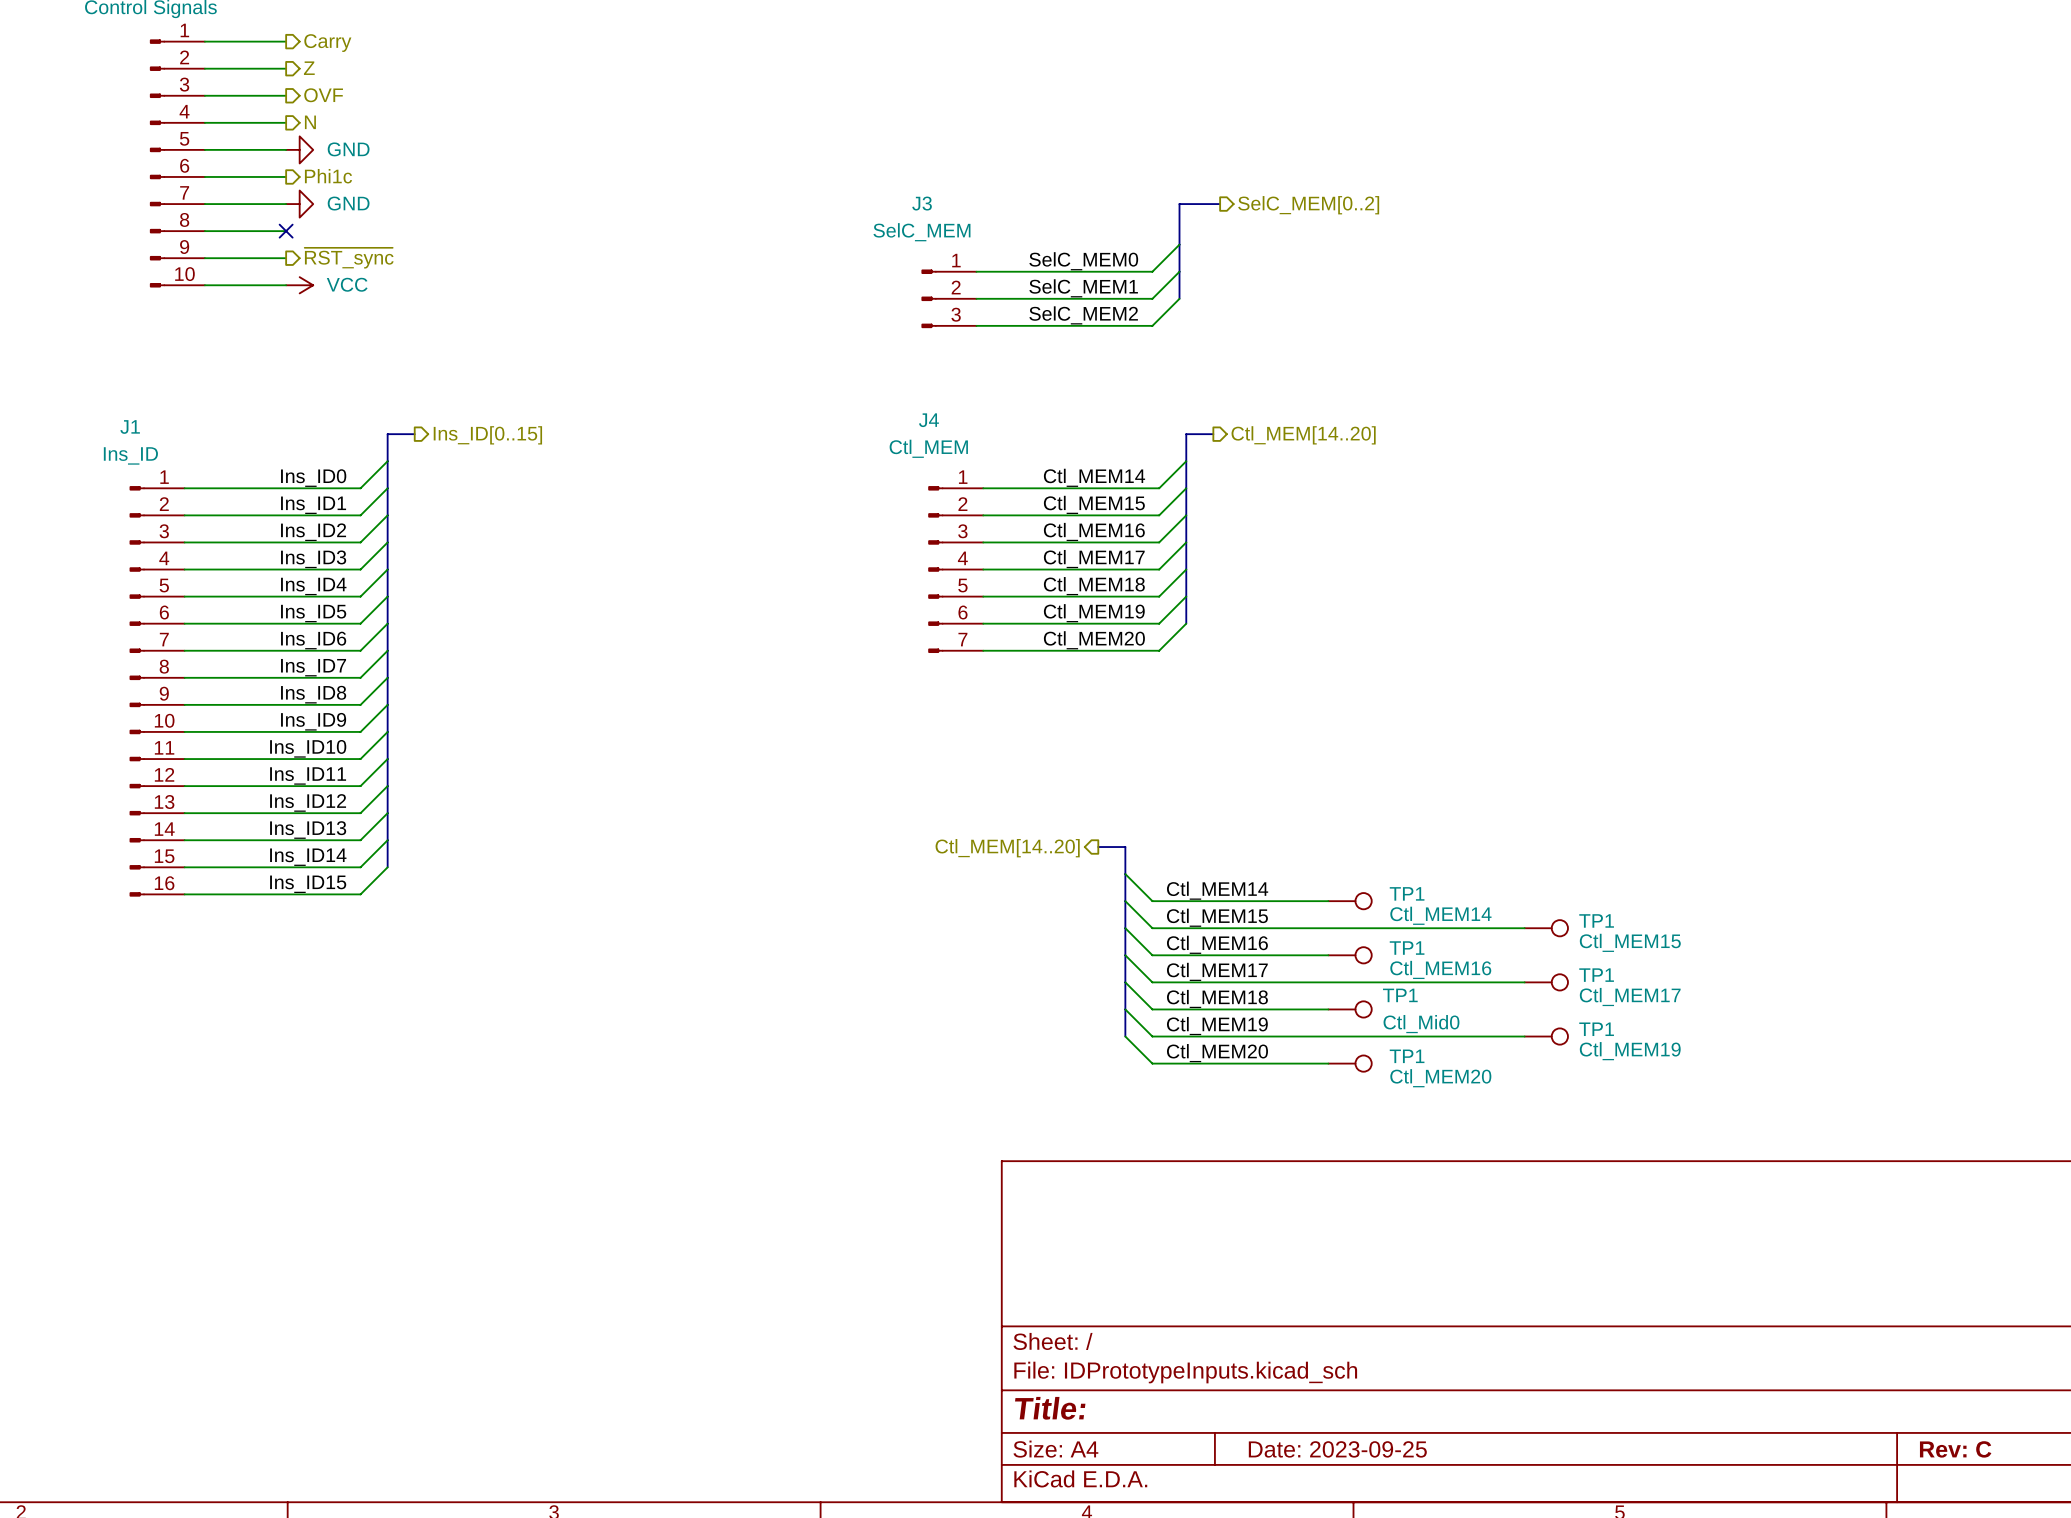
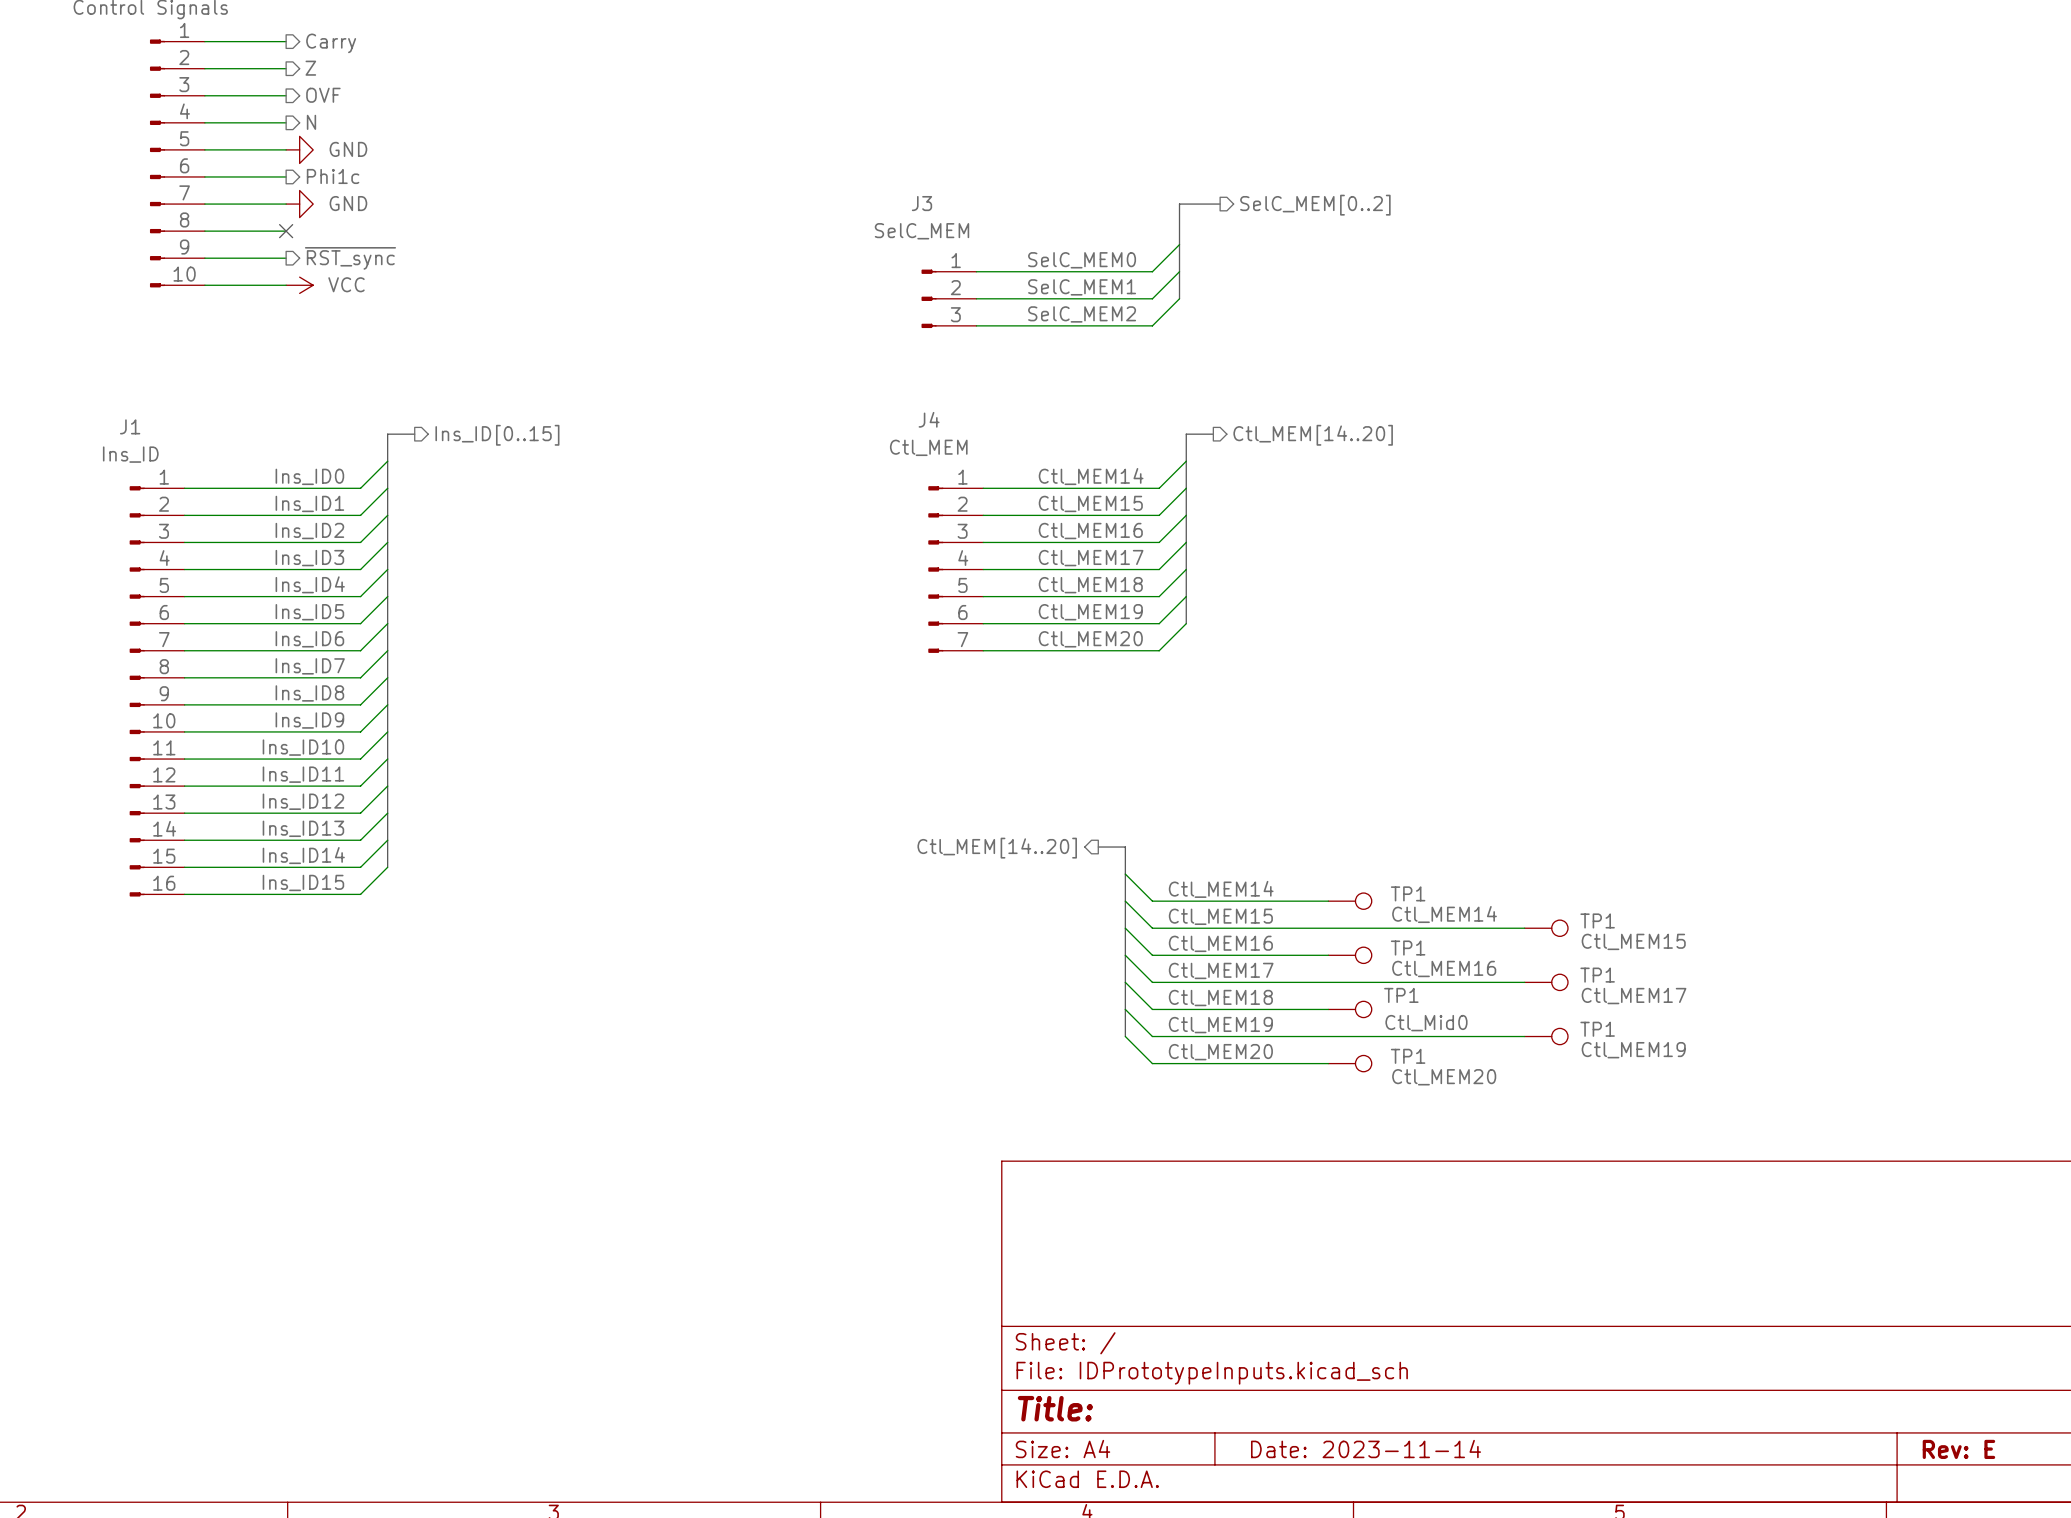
title block: Date: 2023-09-25 (1337, 1449) -> Date: 2023-11-14 (1365, 1449)
title block: Rev: C (1955, 1449) -> Rev: E (1958, 1449)

